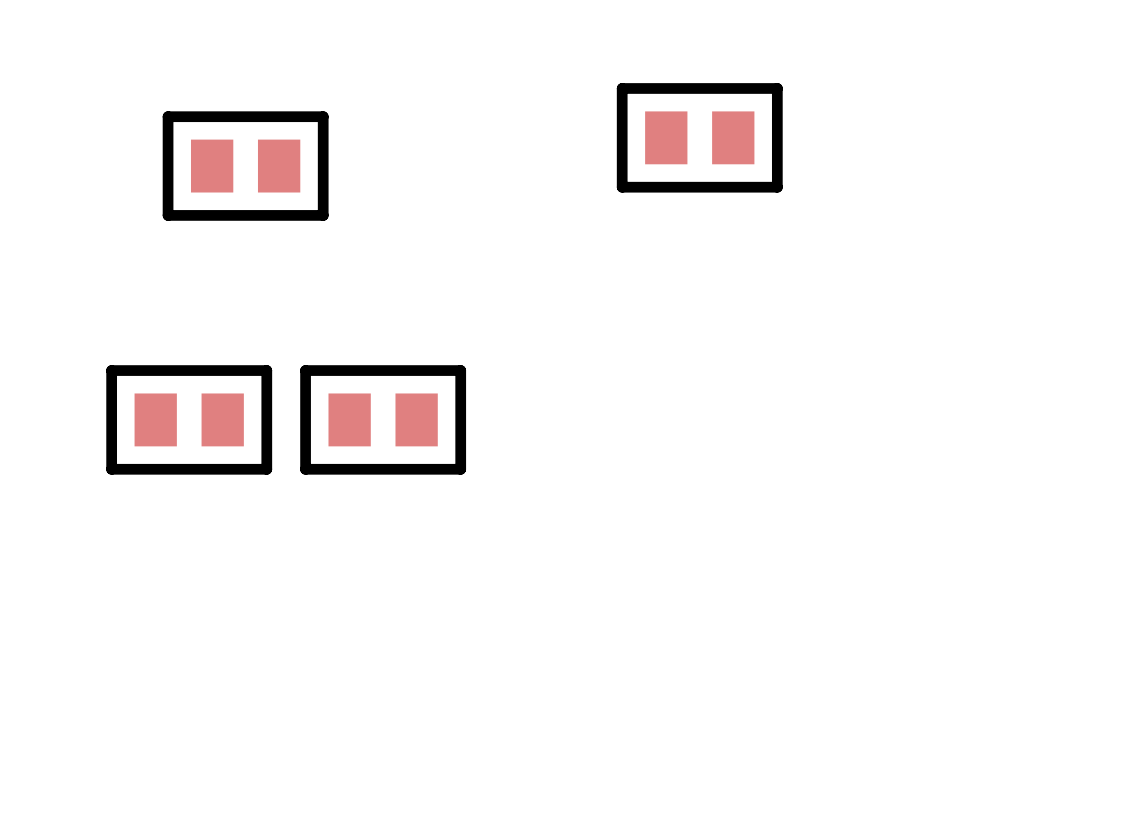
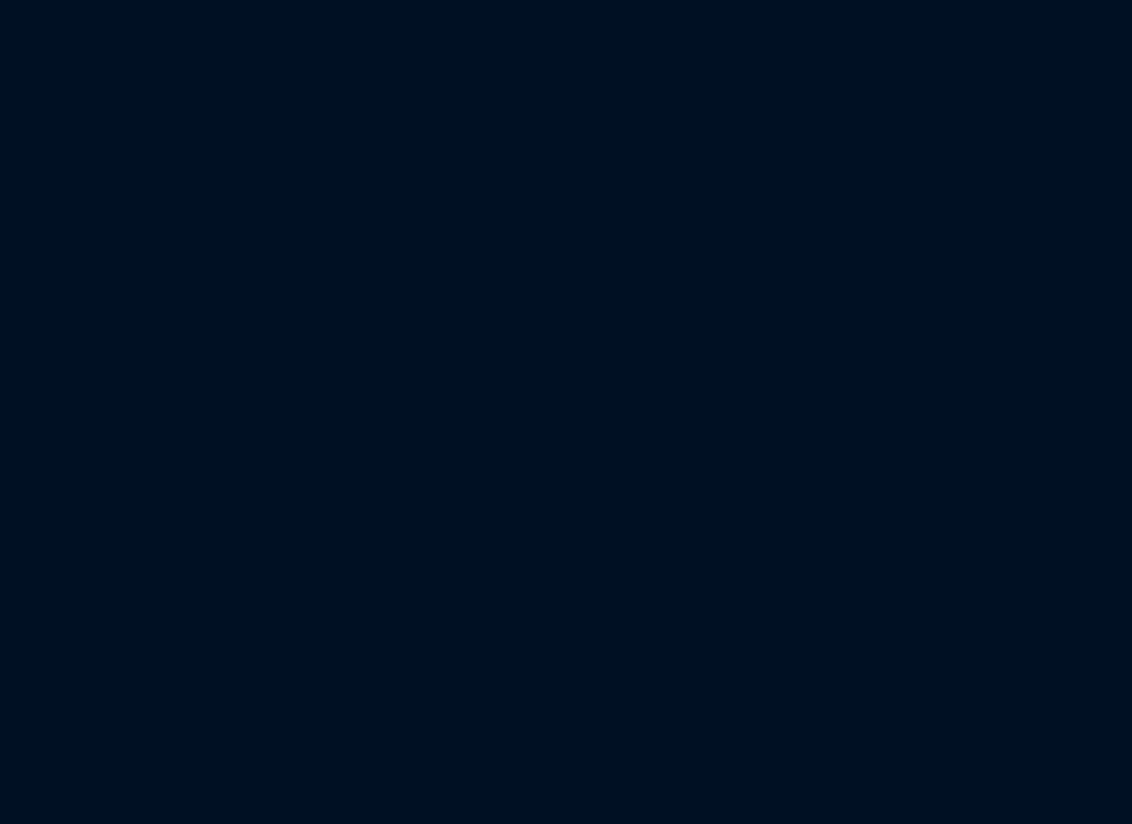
part: (699, 137) -> none
part: (245, 166) -> none
part: (189, 419) -> none
part: (383, 419) -> none

